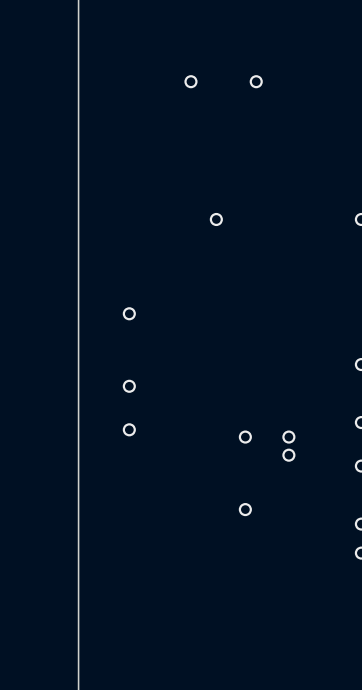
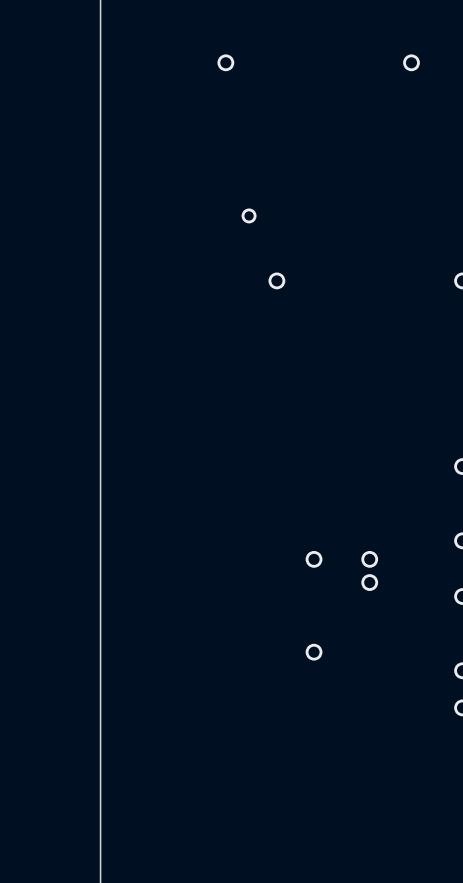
via: none -> (225, 62)
via: none -> (411, 62)
via: (190, 81) -> none
via: (256, 81) -> none
via: none -> (249, 215)
via: (129, 313) -> none
via: (129, 386) -> none
via: (129, 429) -> none

